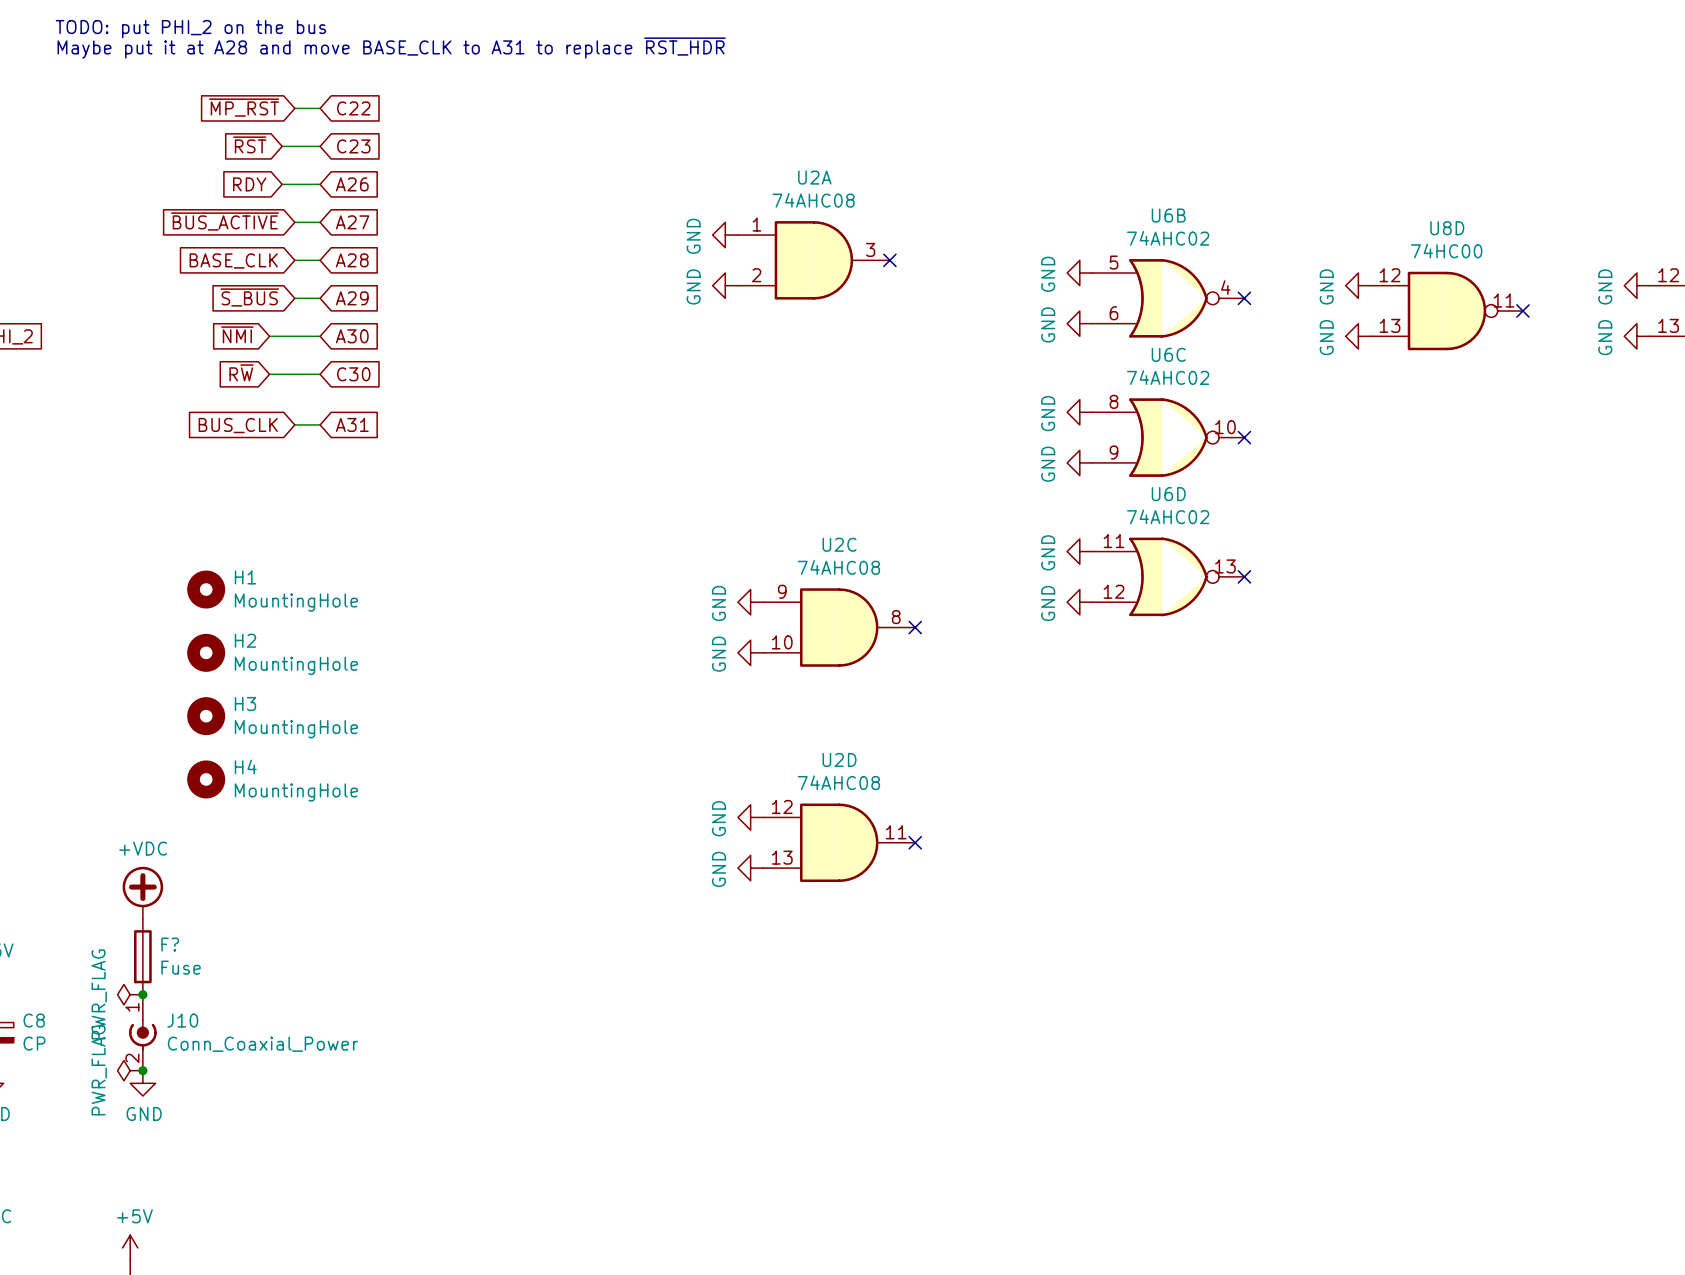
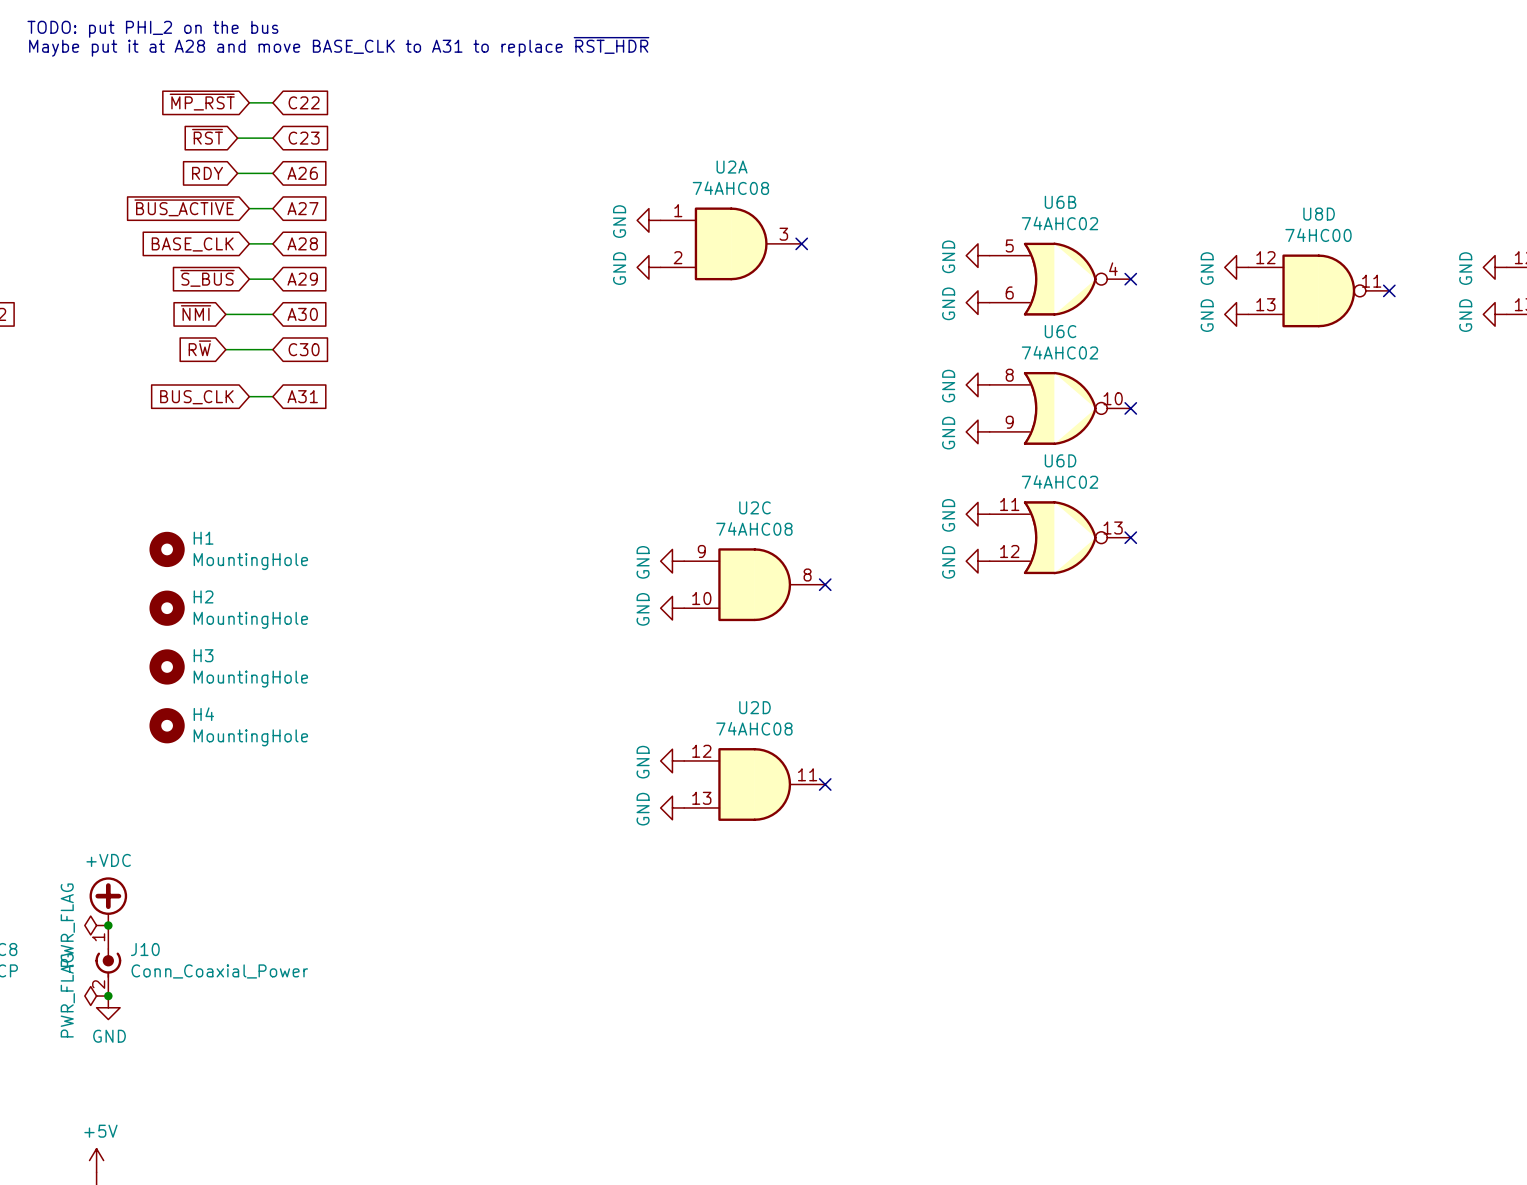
power symbol position: +VDC (142, 892) -> +VDC (108, 901)
F?: Fuse (142, 956) -> none

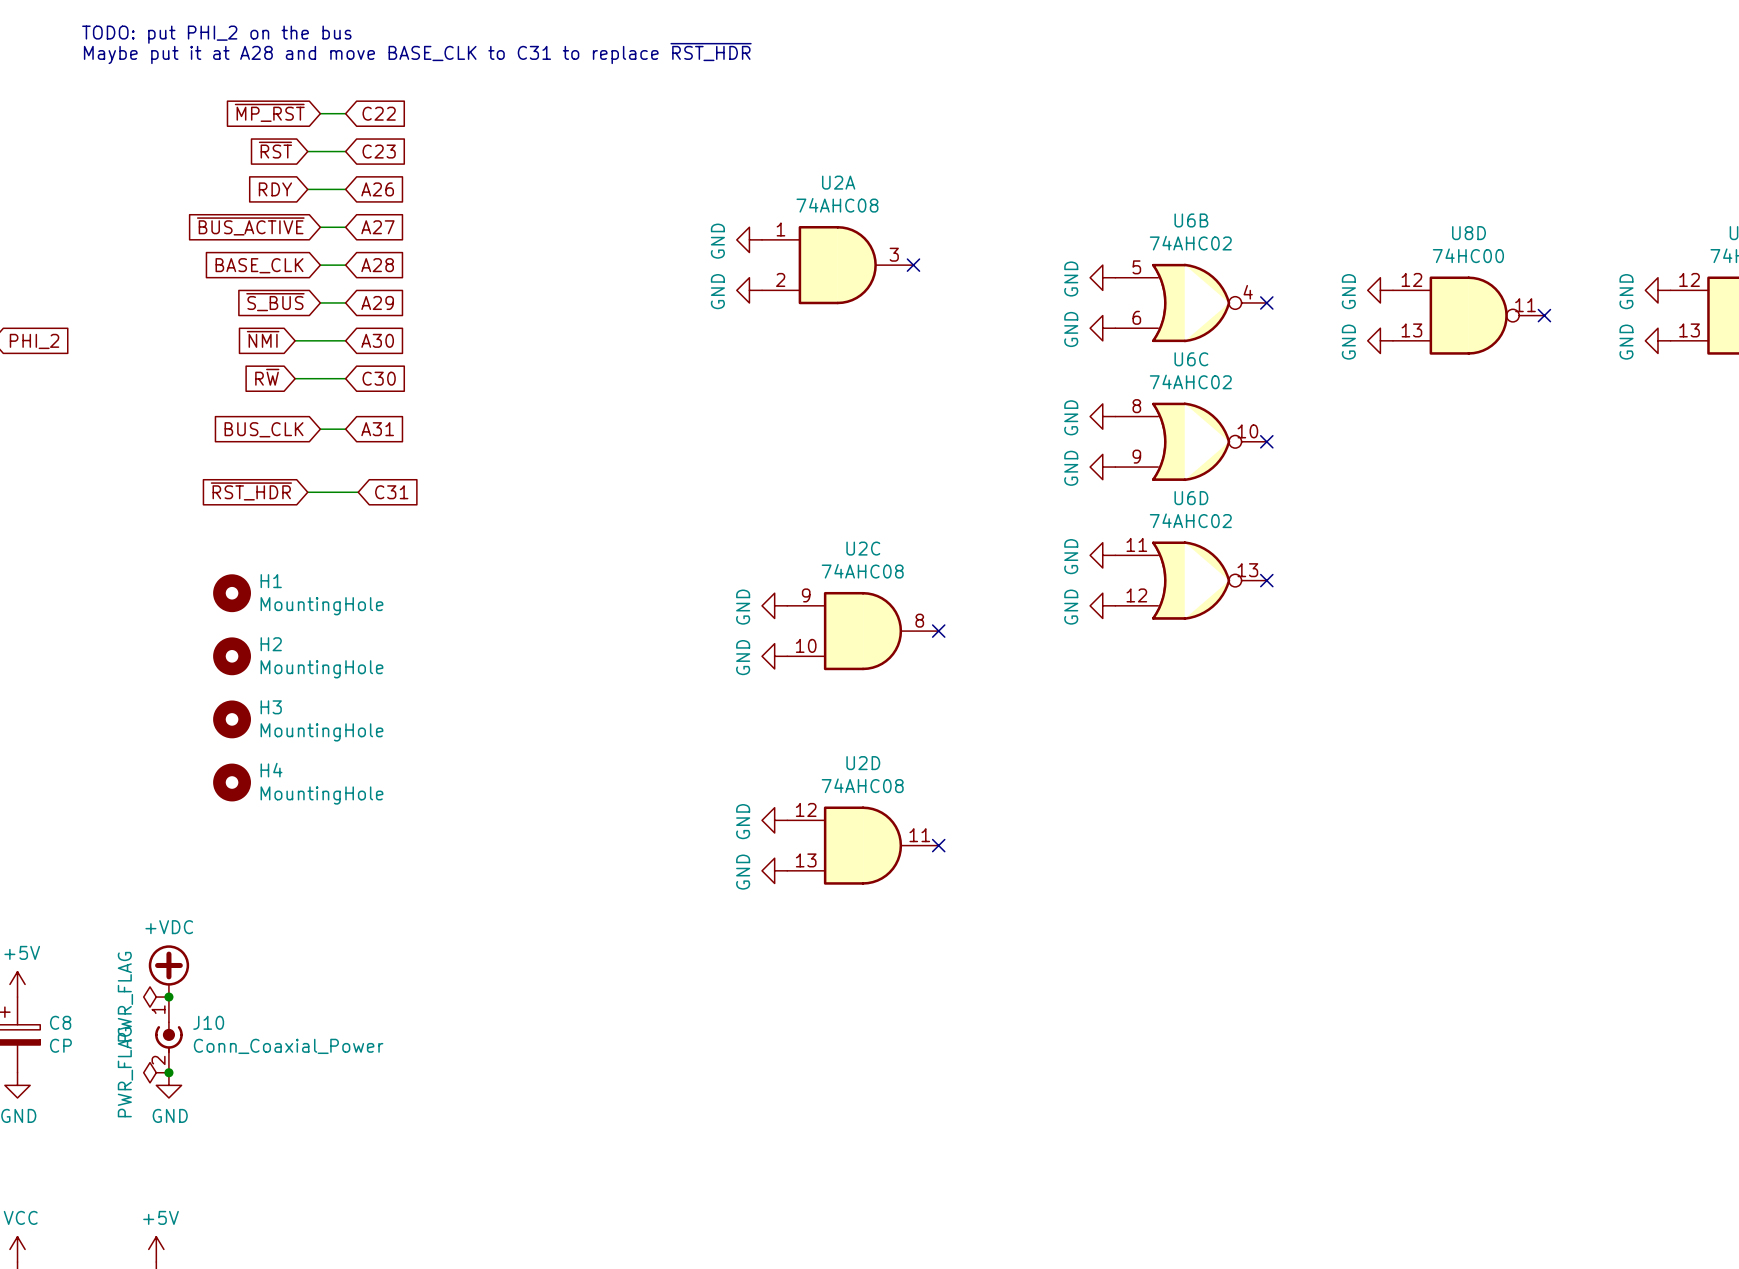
text: Maybe put it at A28 and move BASE_CLK to A31 to replace ~{RST_HDR} (339, 46) -> Maybe put it at A28 and move BASE_CLK to C31 to replace ~{RST_HDR} (417, 53)
global label: none -> ~{RST_HDR} (251, 491)
wire: none -> (307, 492) (358, 492)
global label: none -> C31 (391, 492)

